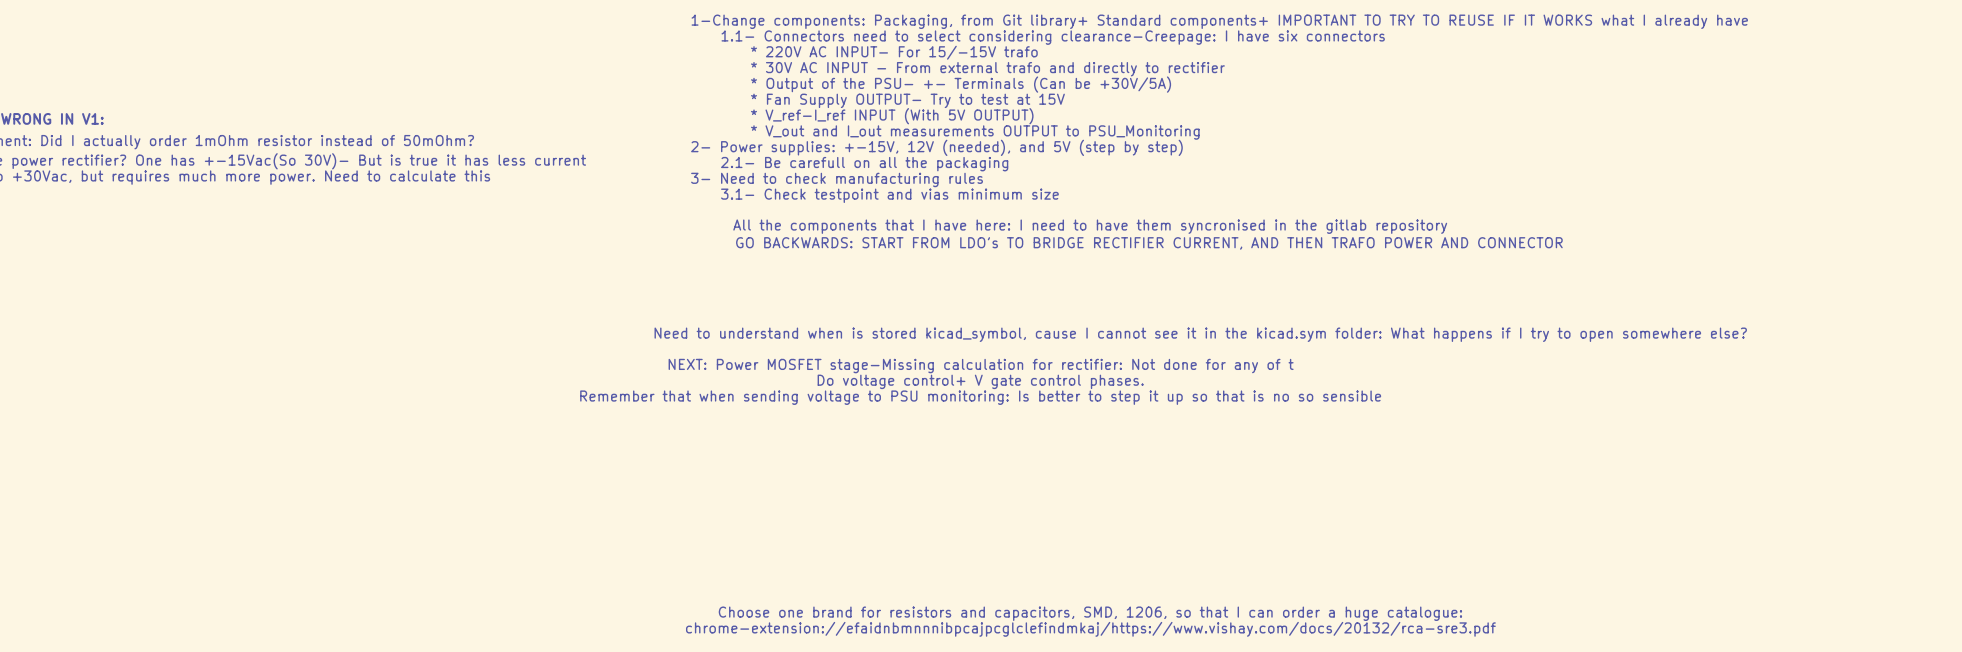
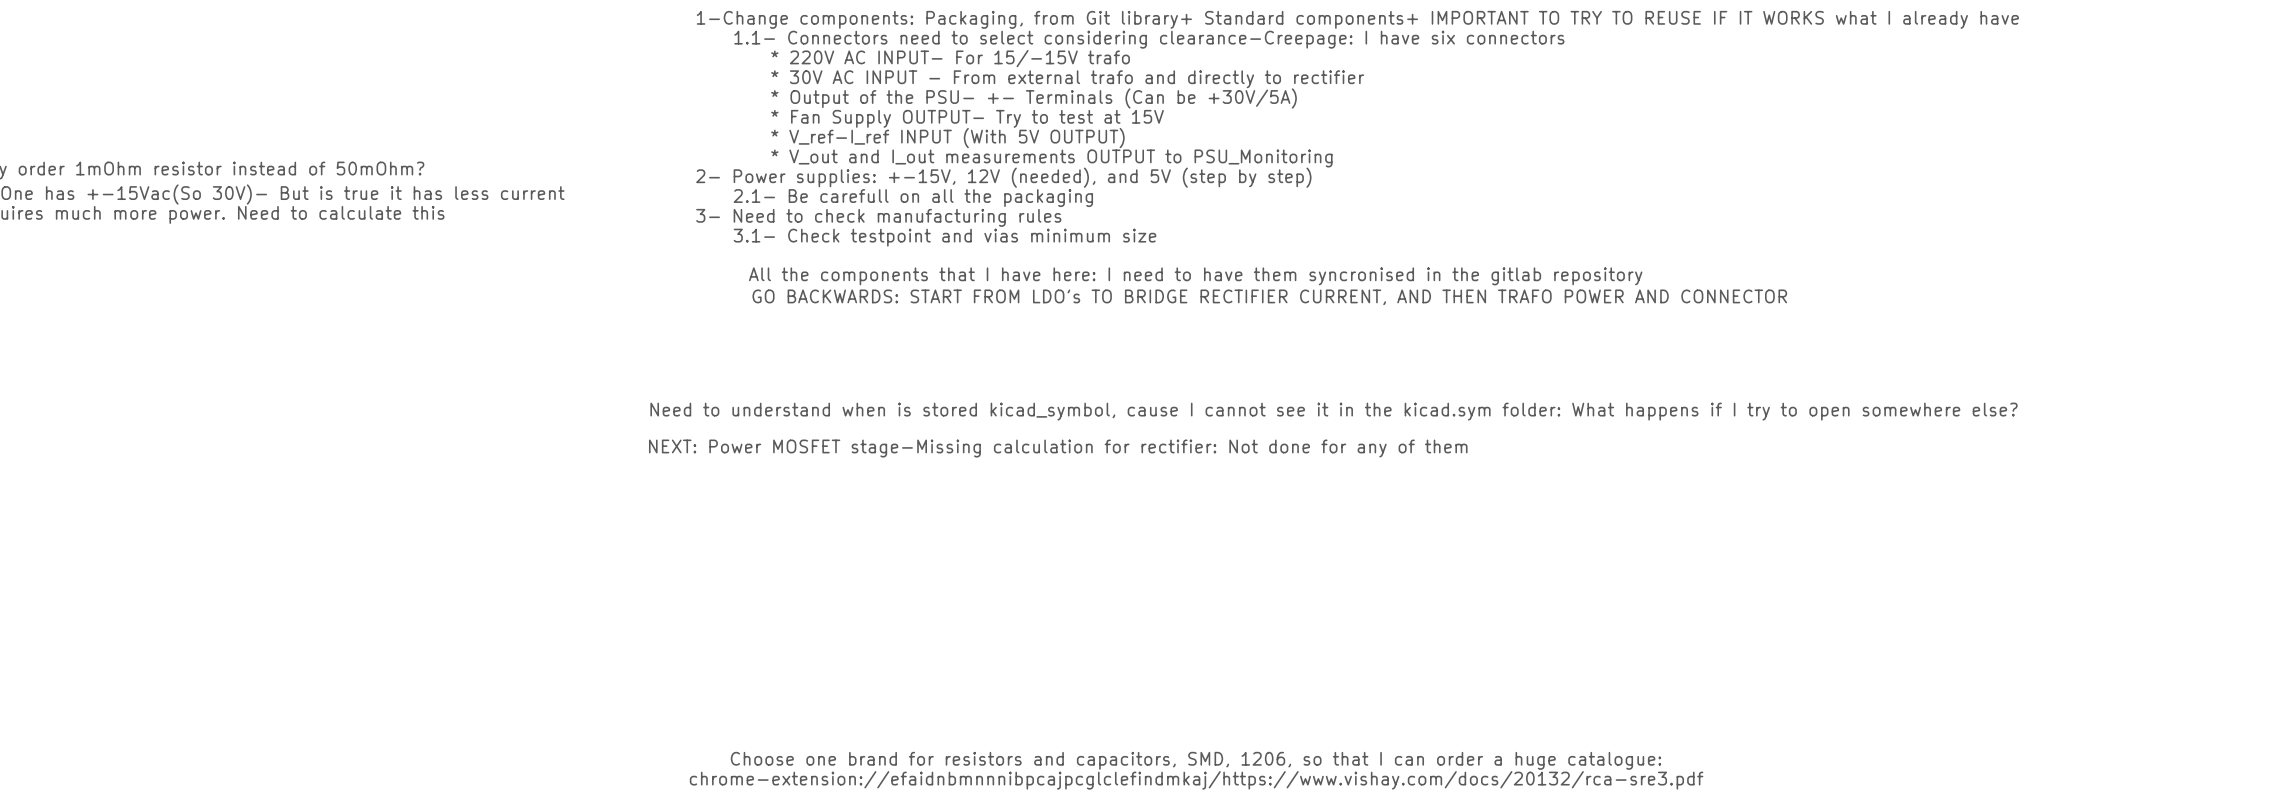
text: NEXT: Power MOSFET stage-Missing calculation for rectifier: Not done for any of t (981, 366) -> NEXT: Power MOSFET stage-Missing calculation for rectifier: Not done for any of them (1058, 448)
text: Do voltage control+ V gate control phases. (980, 381) -> none
text: Remember that when sending voltage to PSU monitoring: Is better to step it up so that is no so sensible (980, 397) -> none

